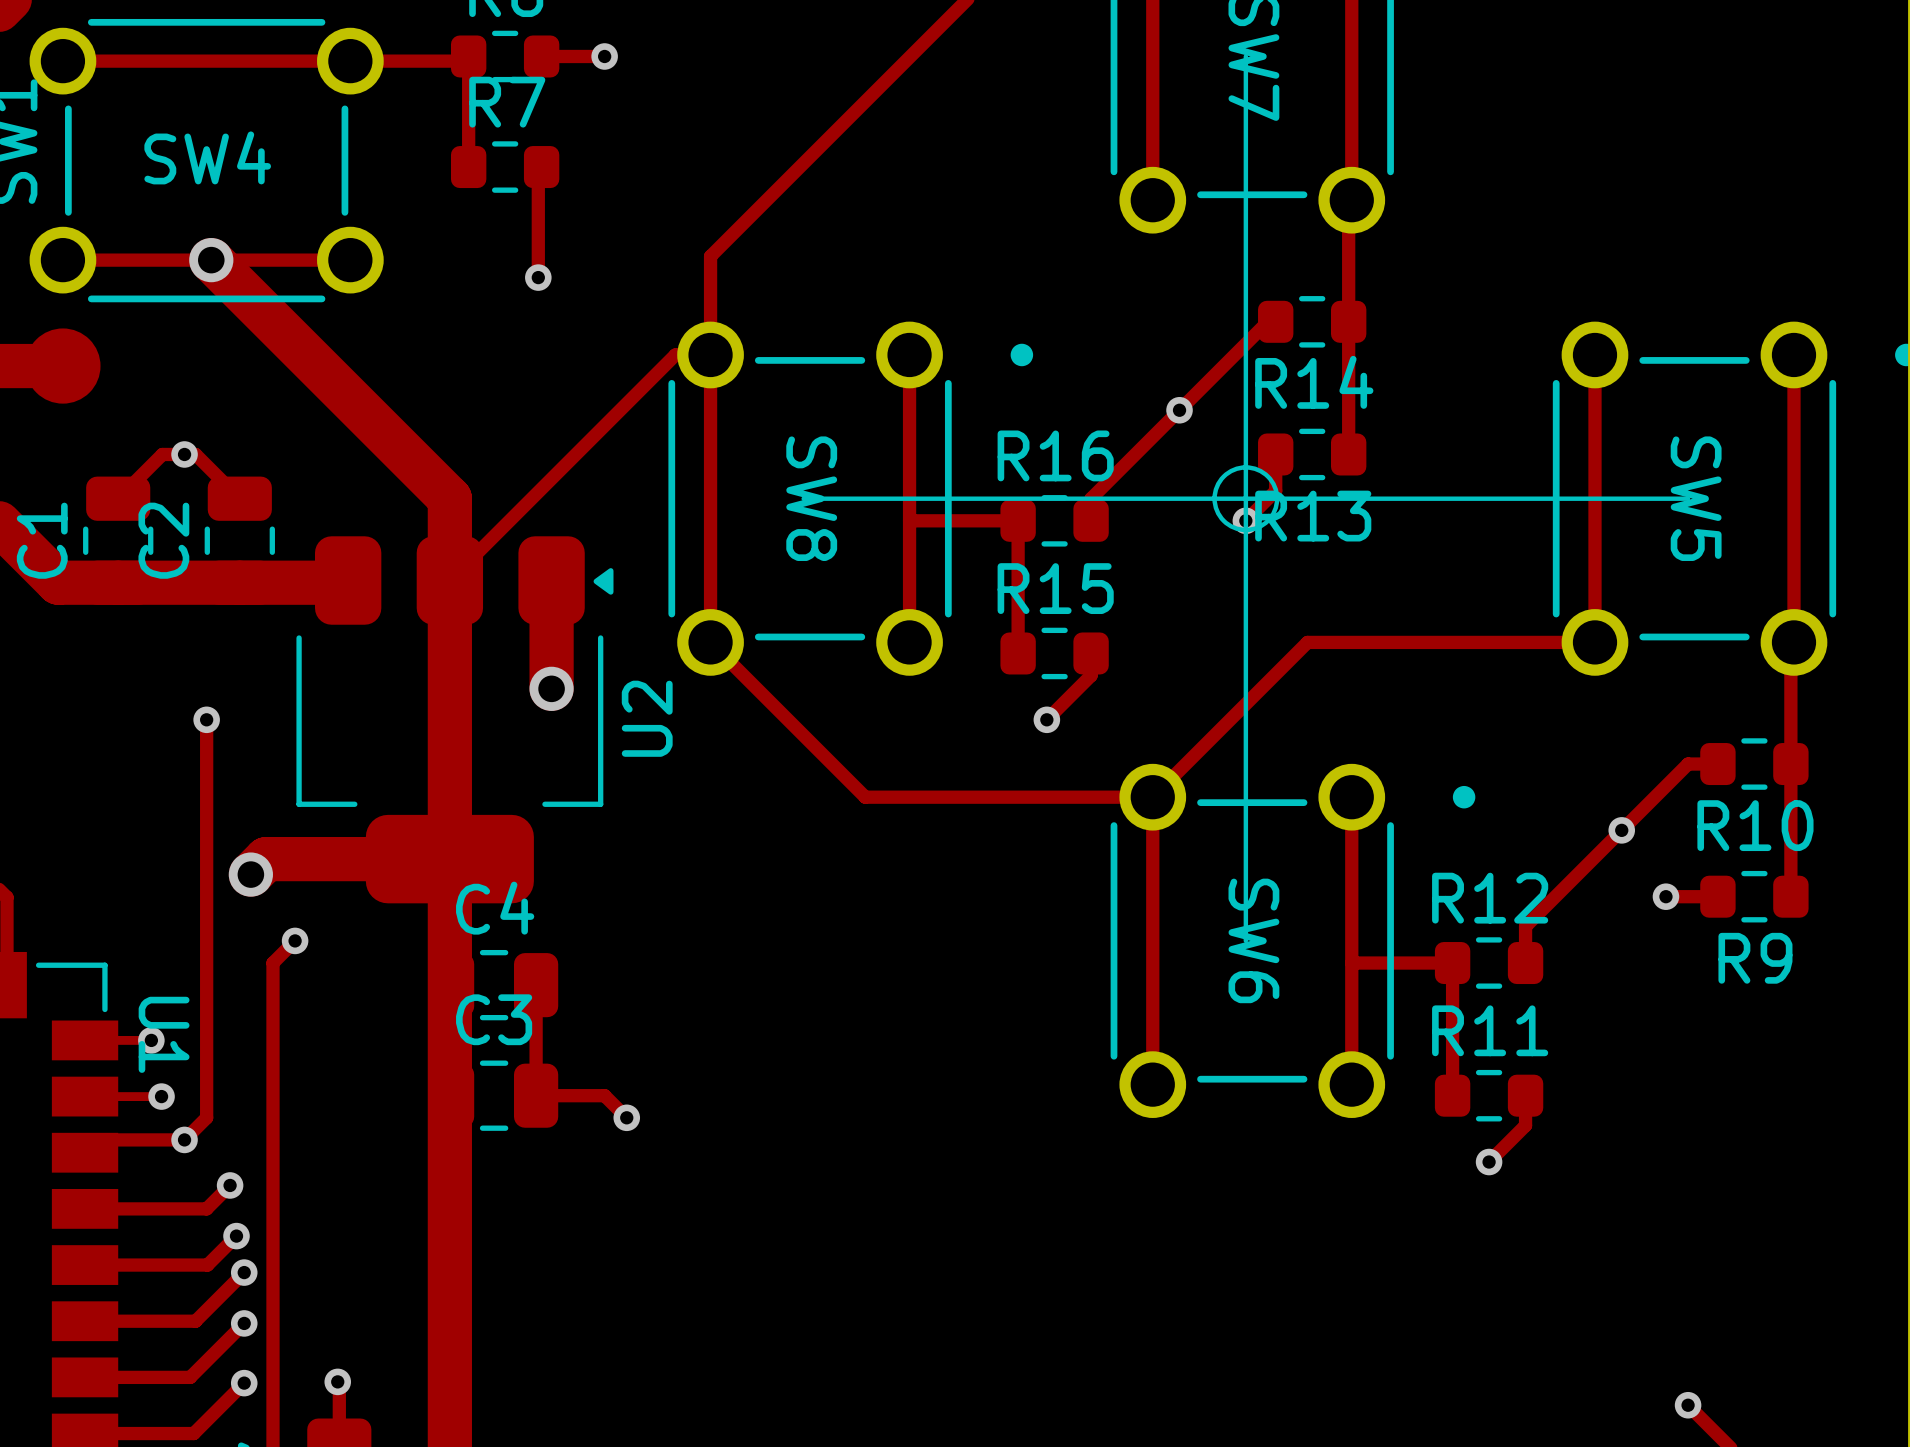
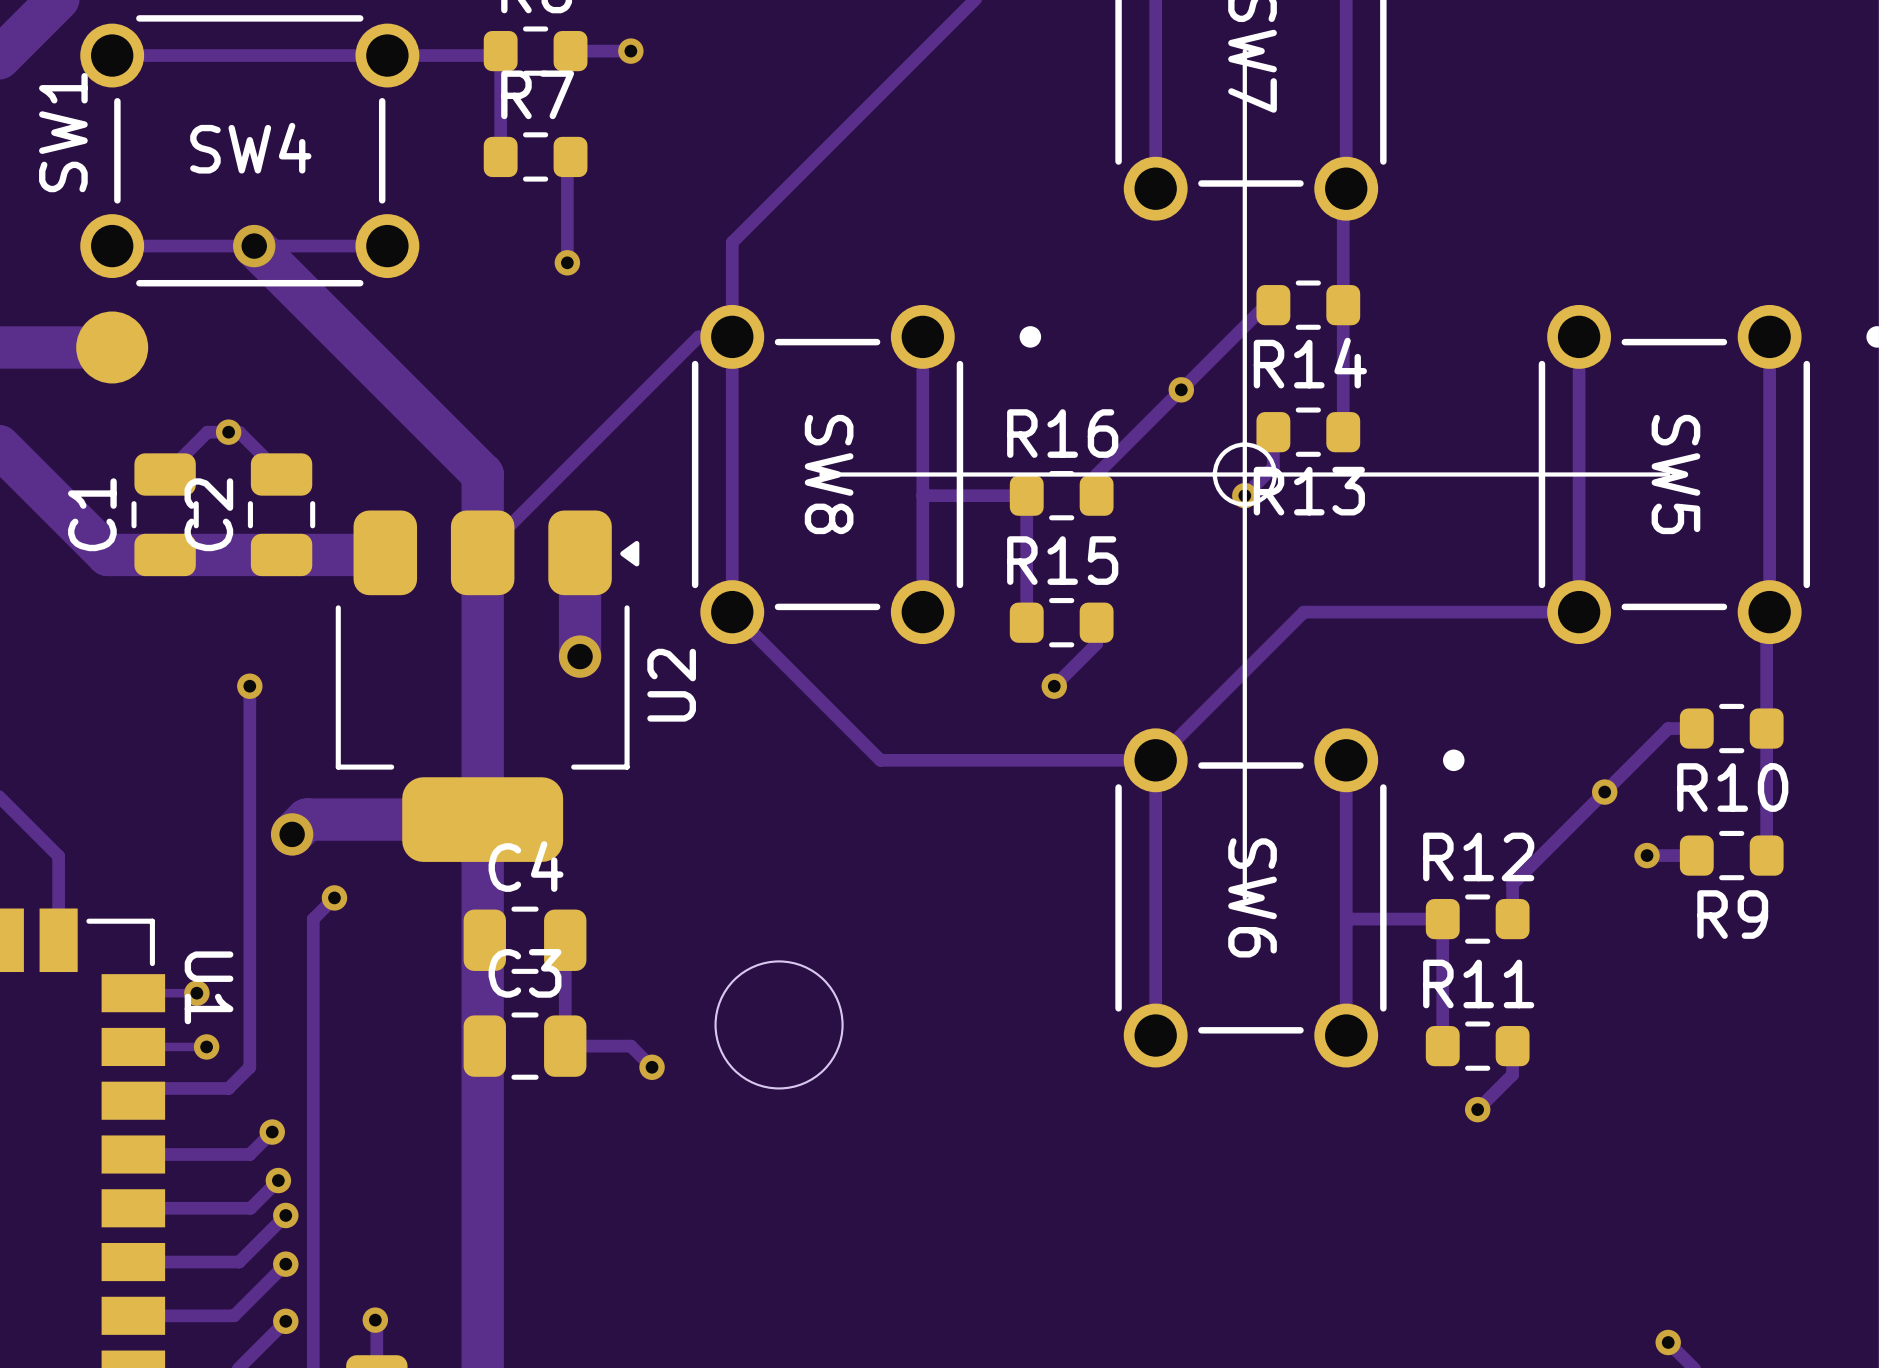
round board edge: none -> [714, 960, 844, 1090]
via: (184, 1139) -> none

